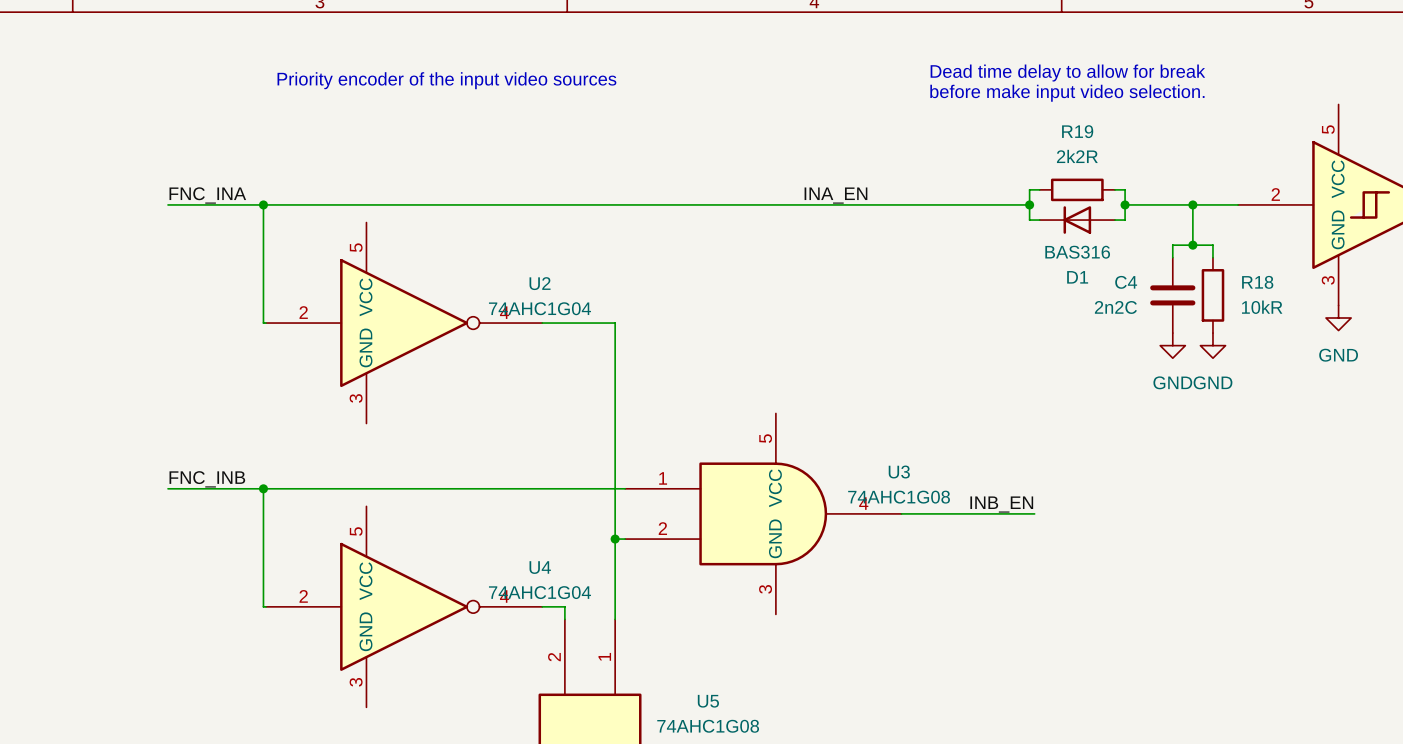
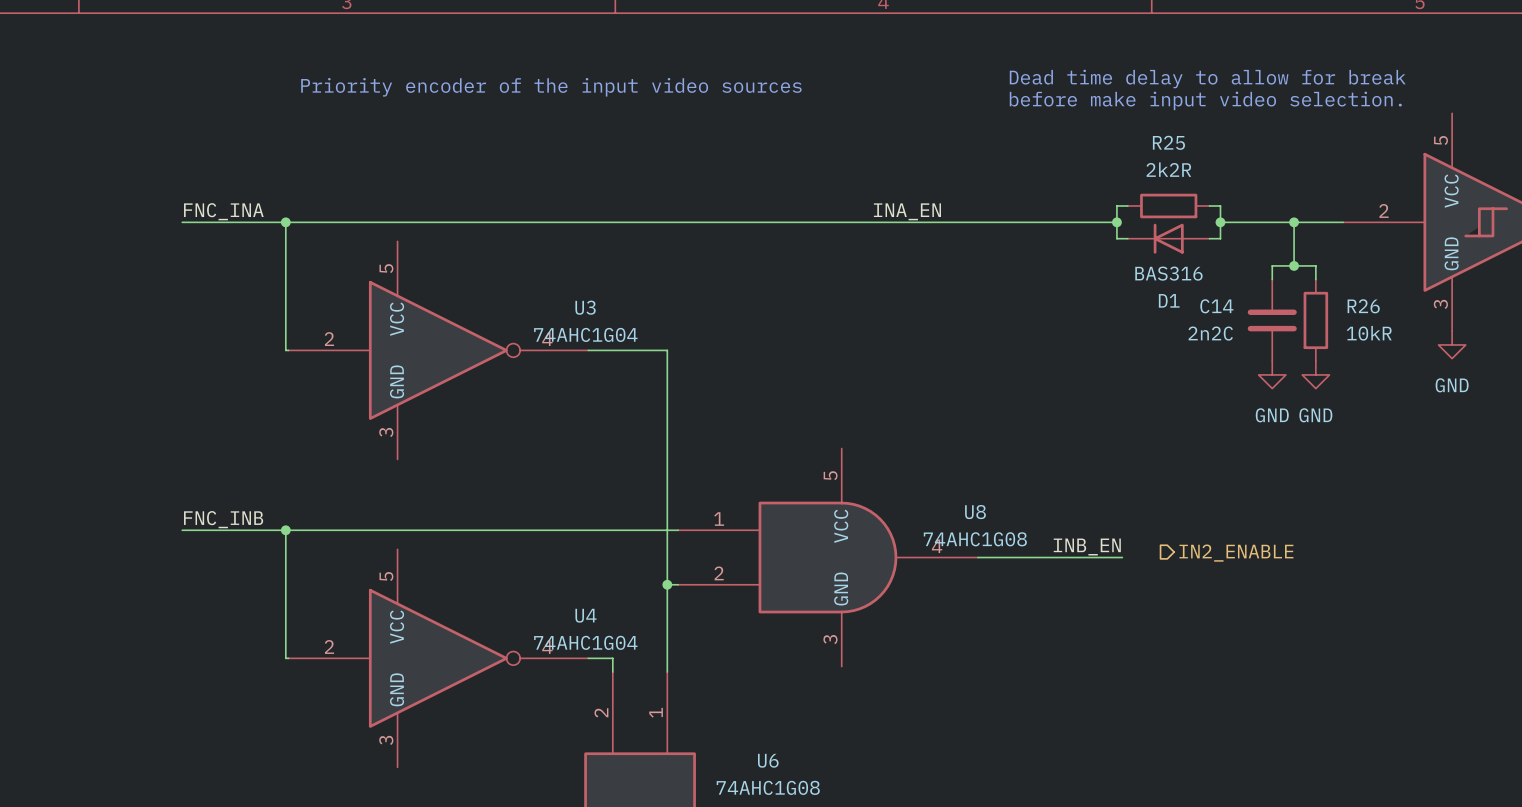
R19 name: R19 (1077, 131) -> R25 (1168, 142)
C4 name: C4 (1126, 282) -> C14 (1216, 306)
R18 name: R18 (1257, 282) -> R26 (1363, 306)
U2 name: U2 (540, 283) -> U3 (585, 307)
U3 name: U3 (899, 472) -> U8 (975, 512)
hierarchical label: none -> IN2_ENABLE (1236, 553)
U5 name: U5 (708, 701) -> U6 (768, 760)

